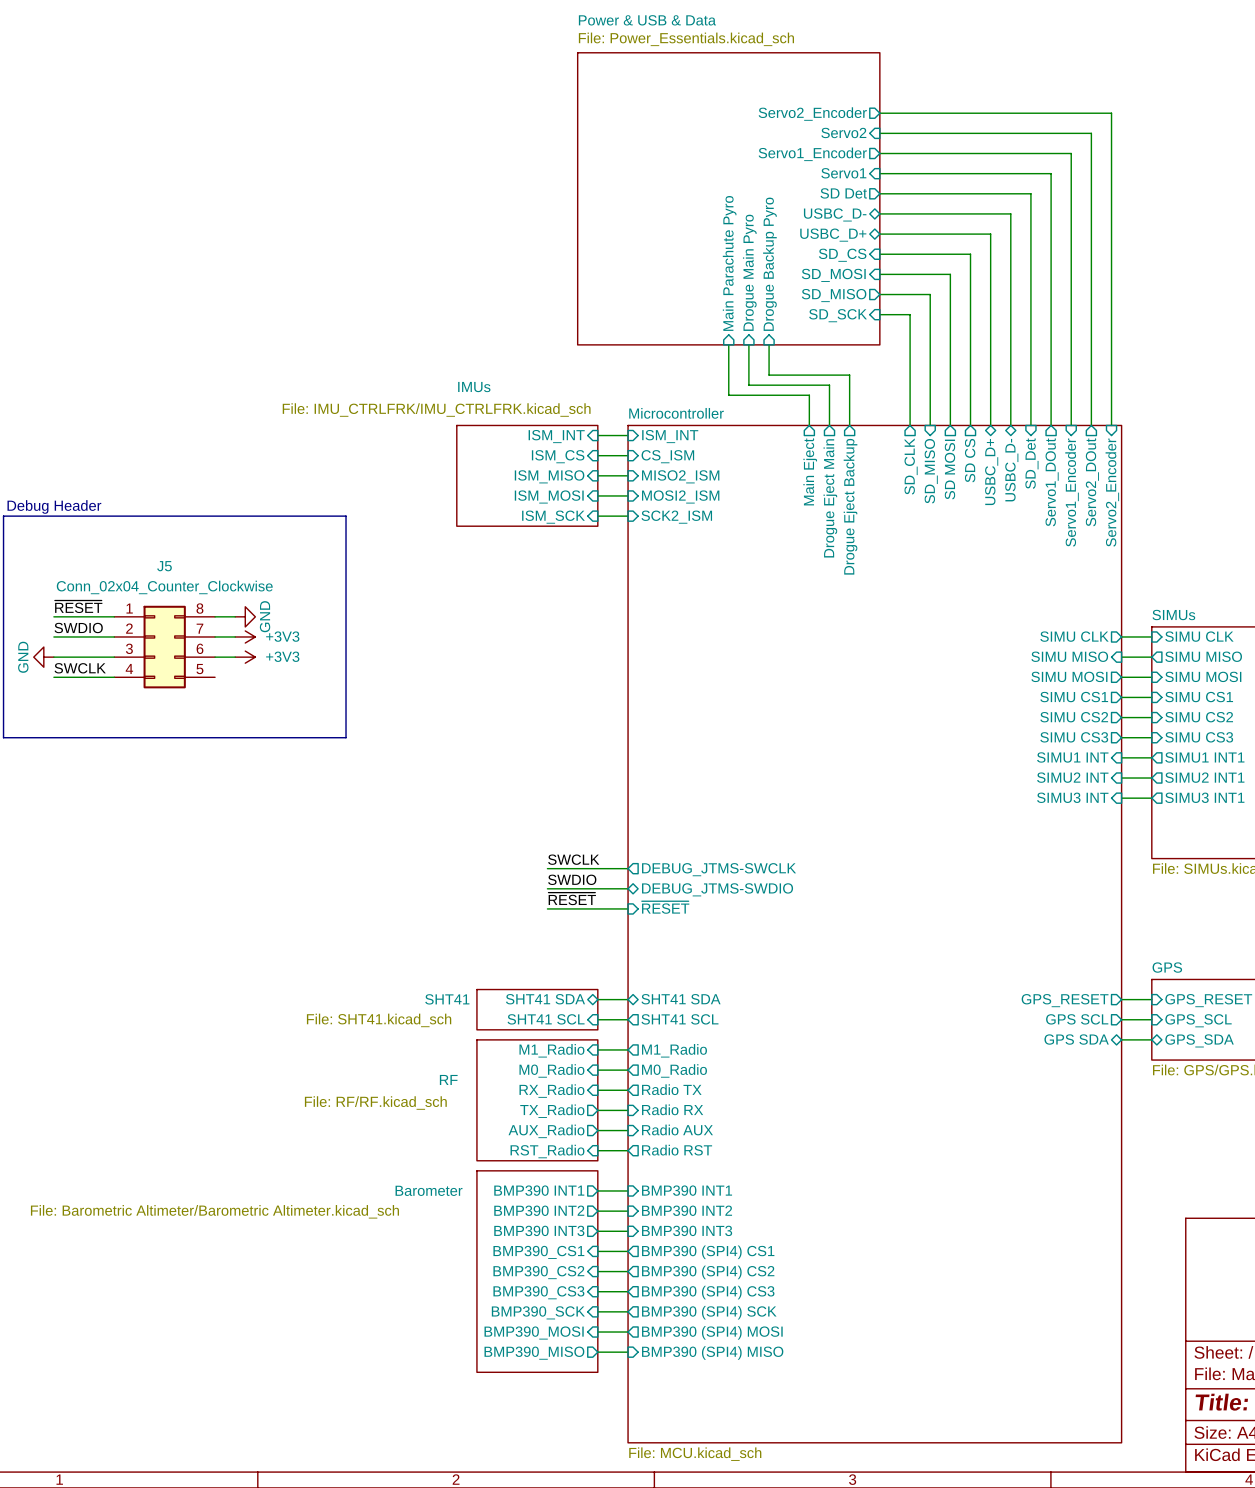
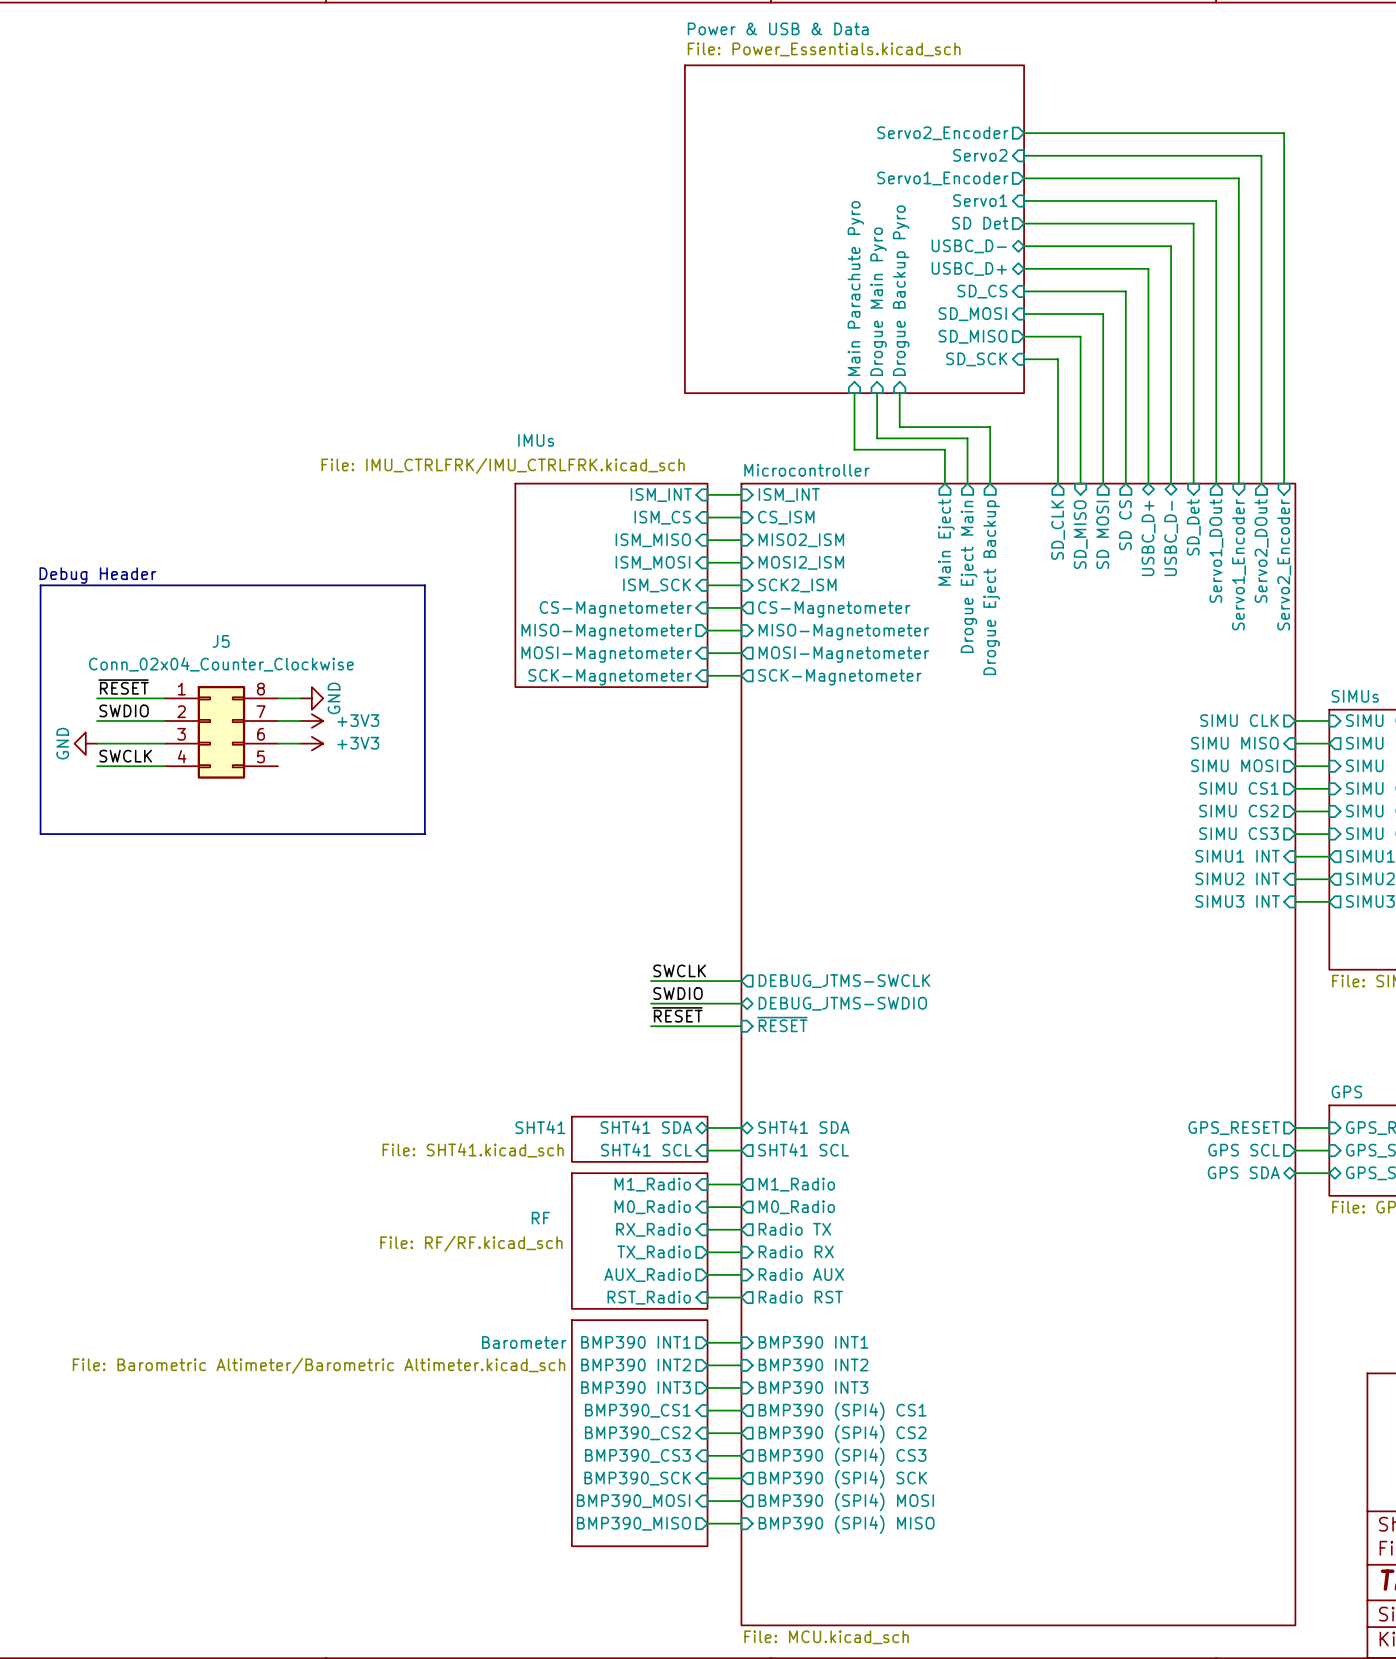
sheet IMUs: File: IMU_CTRLFRK/IMU_CTRLFRK.kicad_sch (527, 475) -> none
sheet IMUs: none -> File: IMU_CTRLFRK/IMU_CTRLFRK.kicad_sch (611, 585)
wire: none -> (707, 607) (741, 607)
sheet pin: none -> CS-Magnetometer (615, 609)
sheet pin: none -> CS-Magnetometer (834, 609)
wire: none -> (707, 630) (741, 630)
sheet pin: none -> MISO-Magnetometer (606, 632)
sheet pin: none -> MISO-Magnetometer (843, 632)
wire: none -> (707, 653) (741, 653)
sheet pin: none -> MOSI-Magnetometer (606, 654)
sheet pin: none -> MOSI-Magnetometer (843, 654)
wire: none -> (707, 675) (741, 675)
sheet pin: none -> SCK-Magnetometer (610, 677)
sheet pin: none -> SCK-Magnetometer (839, 677)

